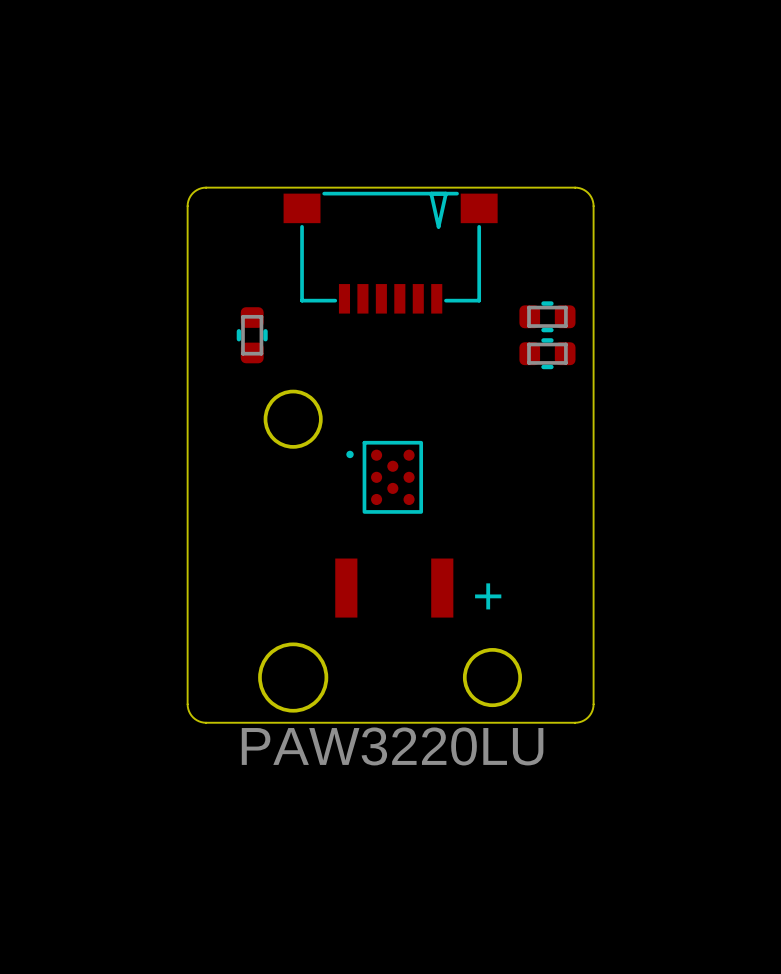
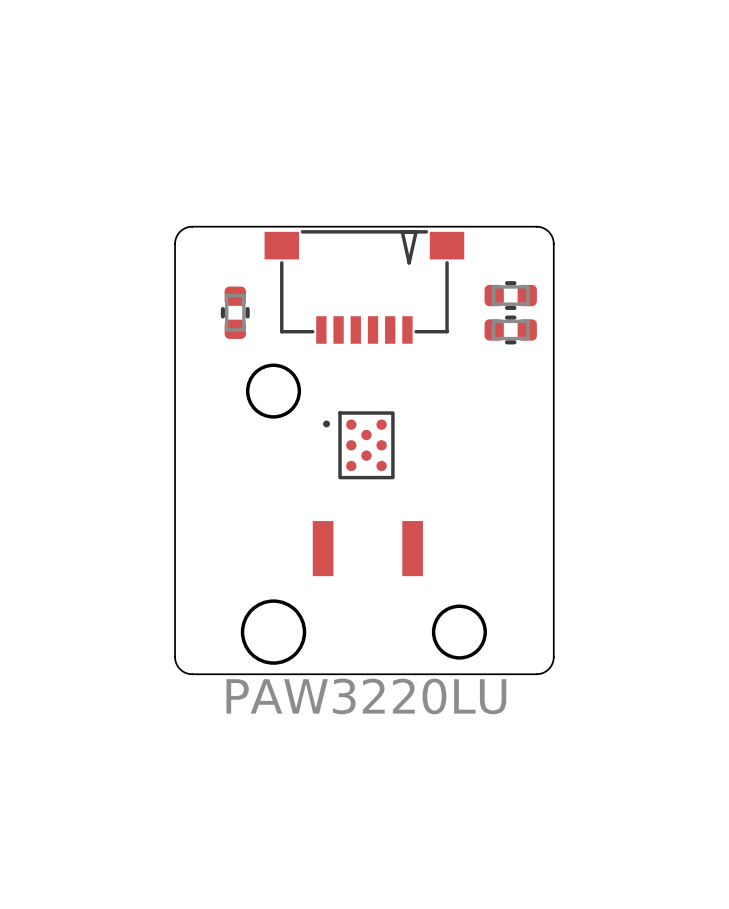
part position: (390, 252) -> (364, 286)
board edge: (187, 261) (188, 201) (194, 191) (206, 187) (577, 187) (588, 193) (592, 201) (593, 261) -> (175, 243) (180, 231) (192, 226) (536, 226) (548, 231) (553, 243)
part text: + (488, 596) -> none

